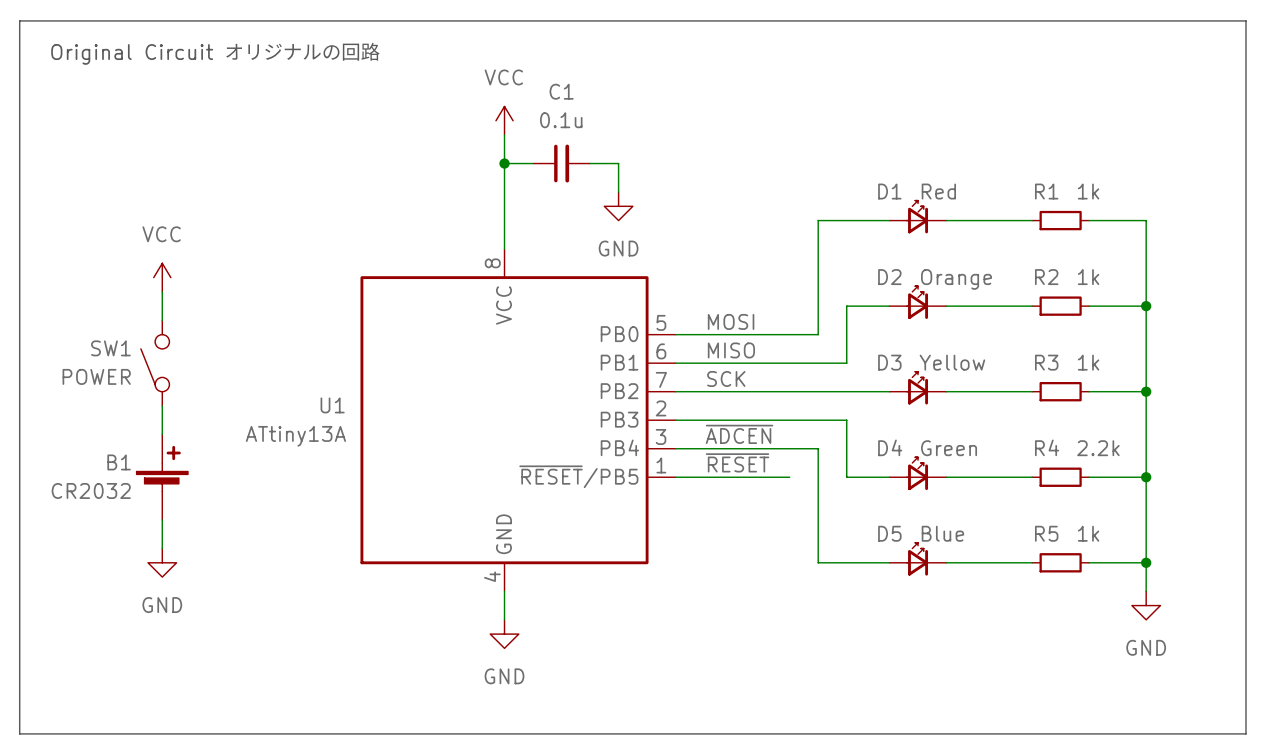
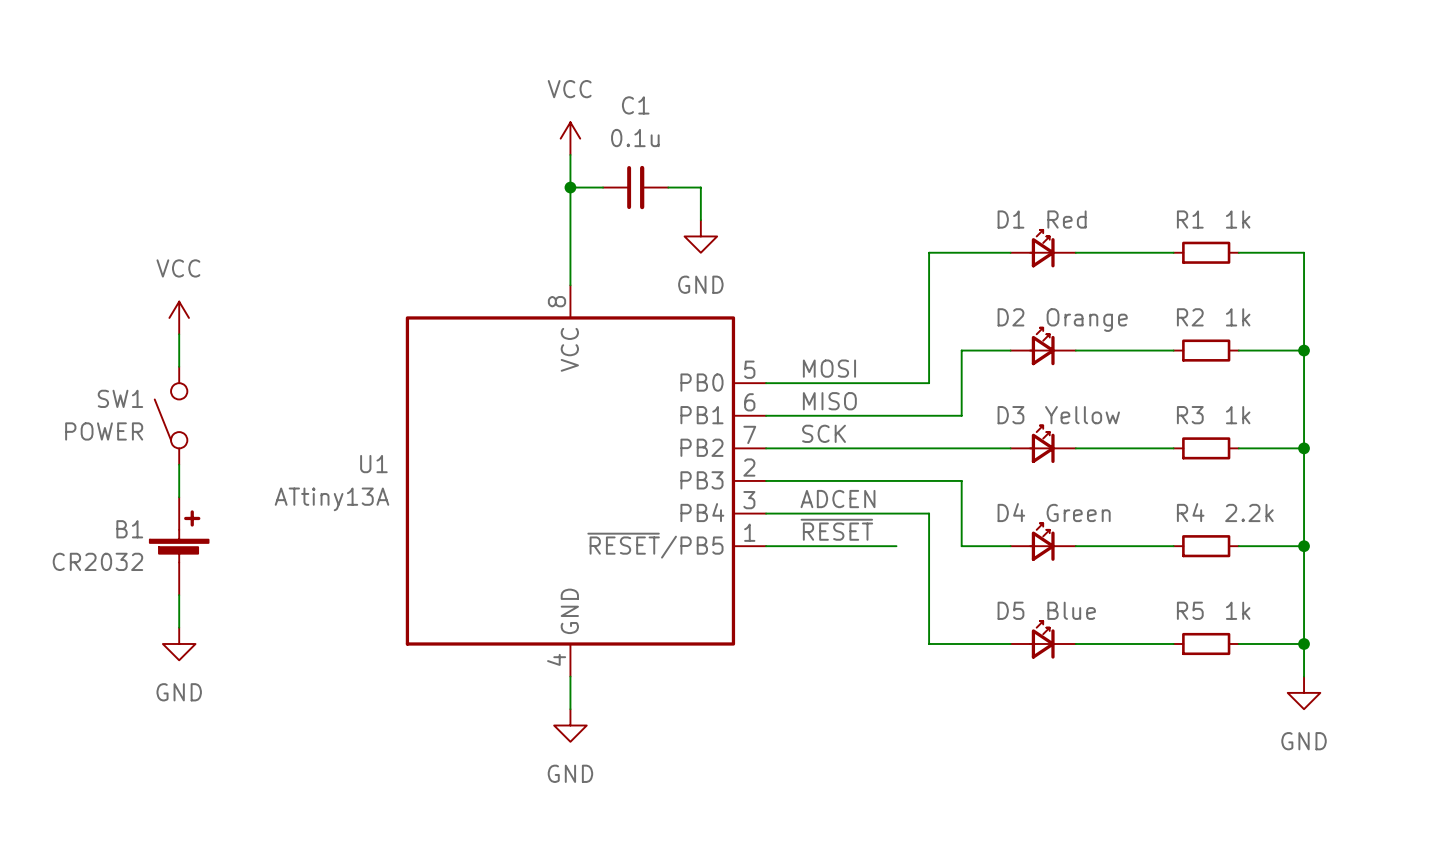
line: (19, 20) (19, 733) (1245, 733) (1245, 20) (19, 20) -> none
text: Original Circuit オリジナルの回路 (215, 53) -> none
label: ~{ADCEN} (739, 434) -> ADCEN (837, 499)

